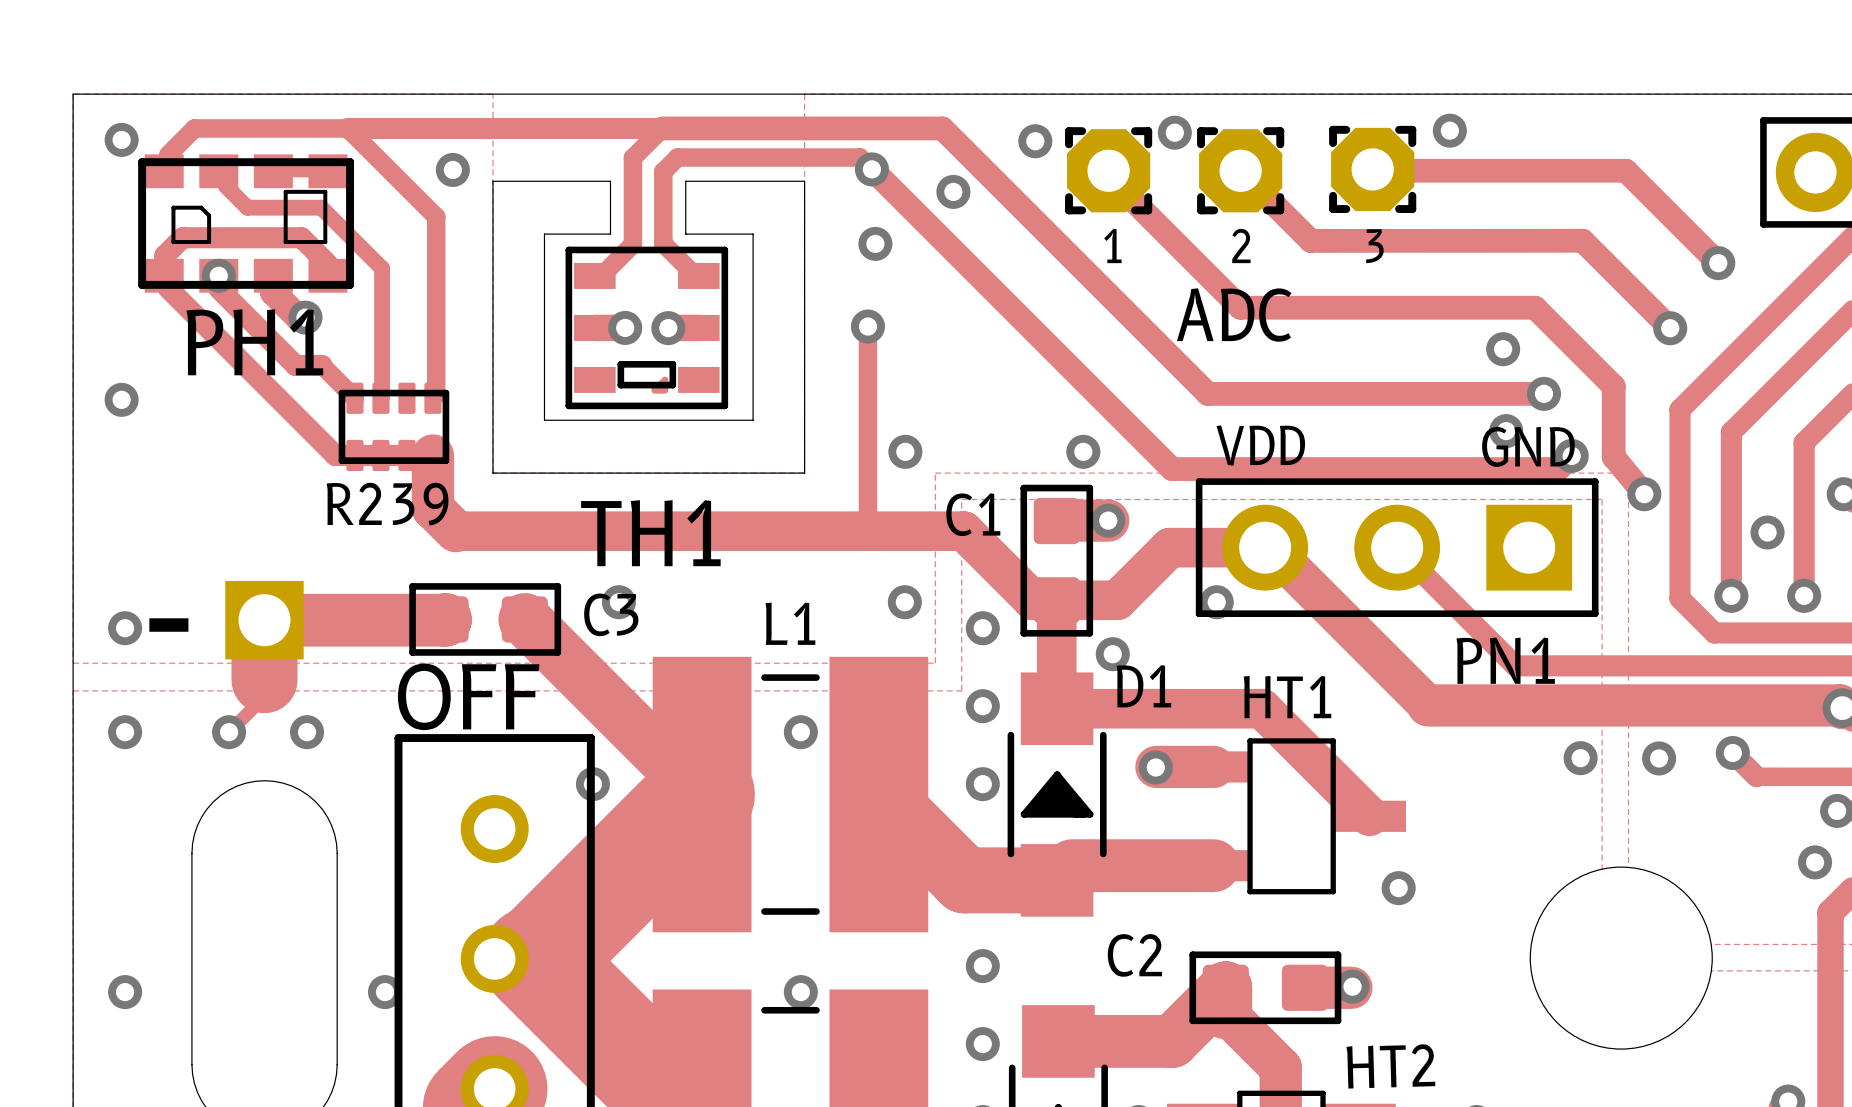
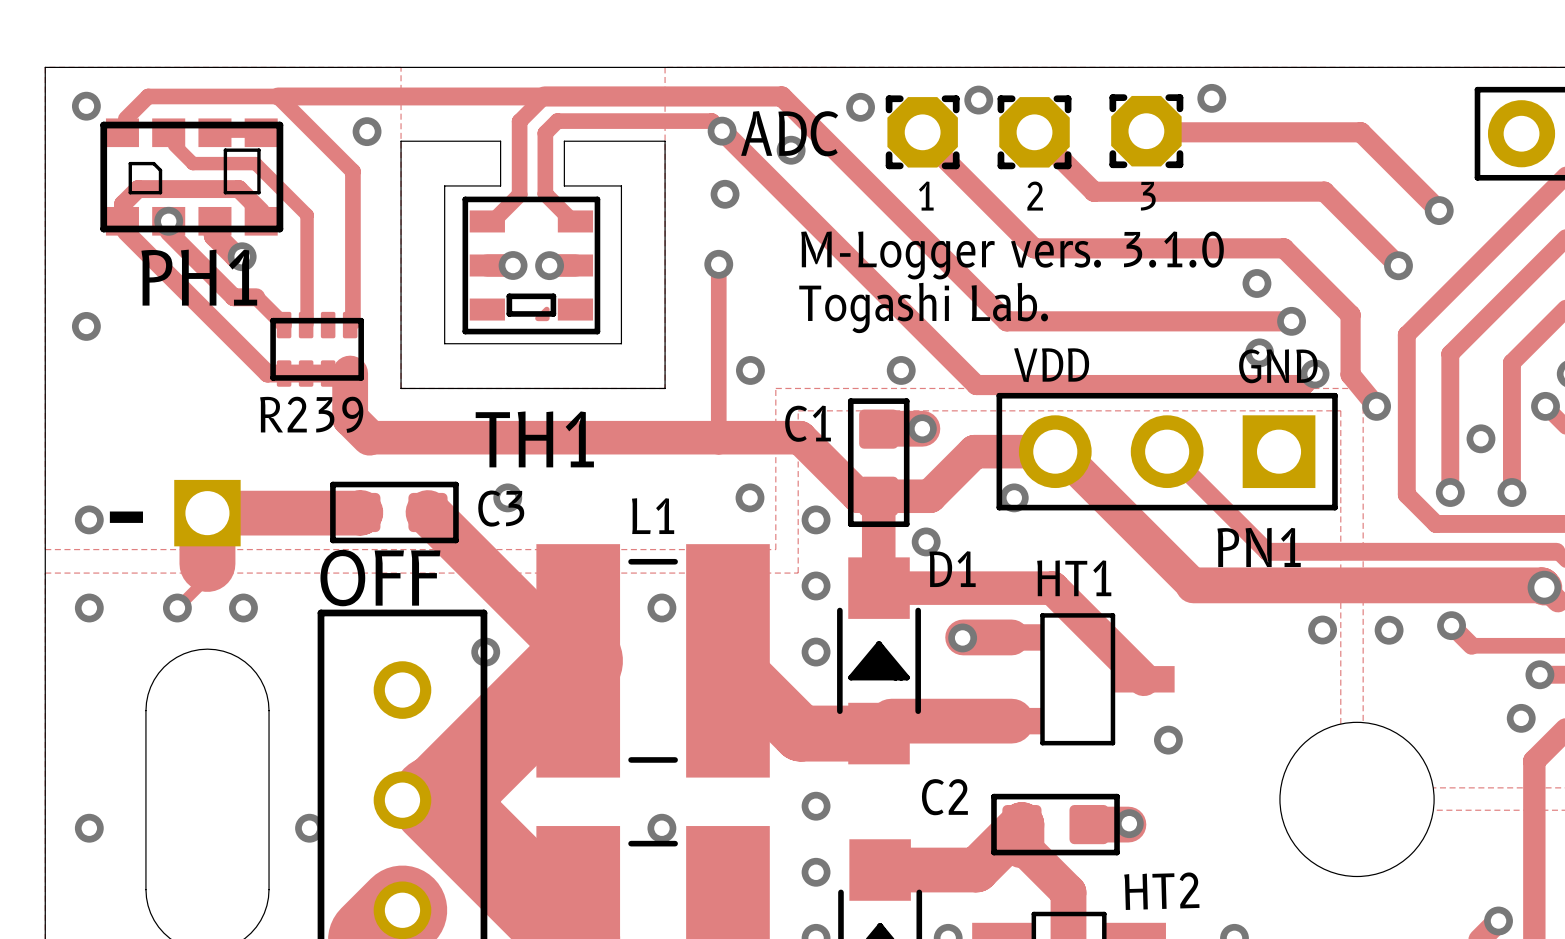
text position: ADC (1234, 315) -> ADC (789, 133)
text: none -> M-Logger vers. 3.1.0 (1012, 255)
text: none -> Togashi Lab. (923, 307)

